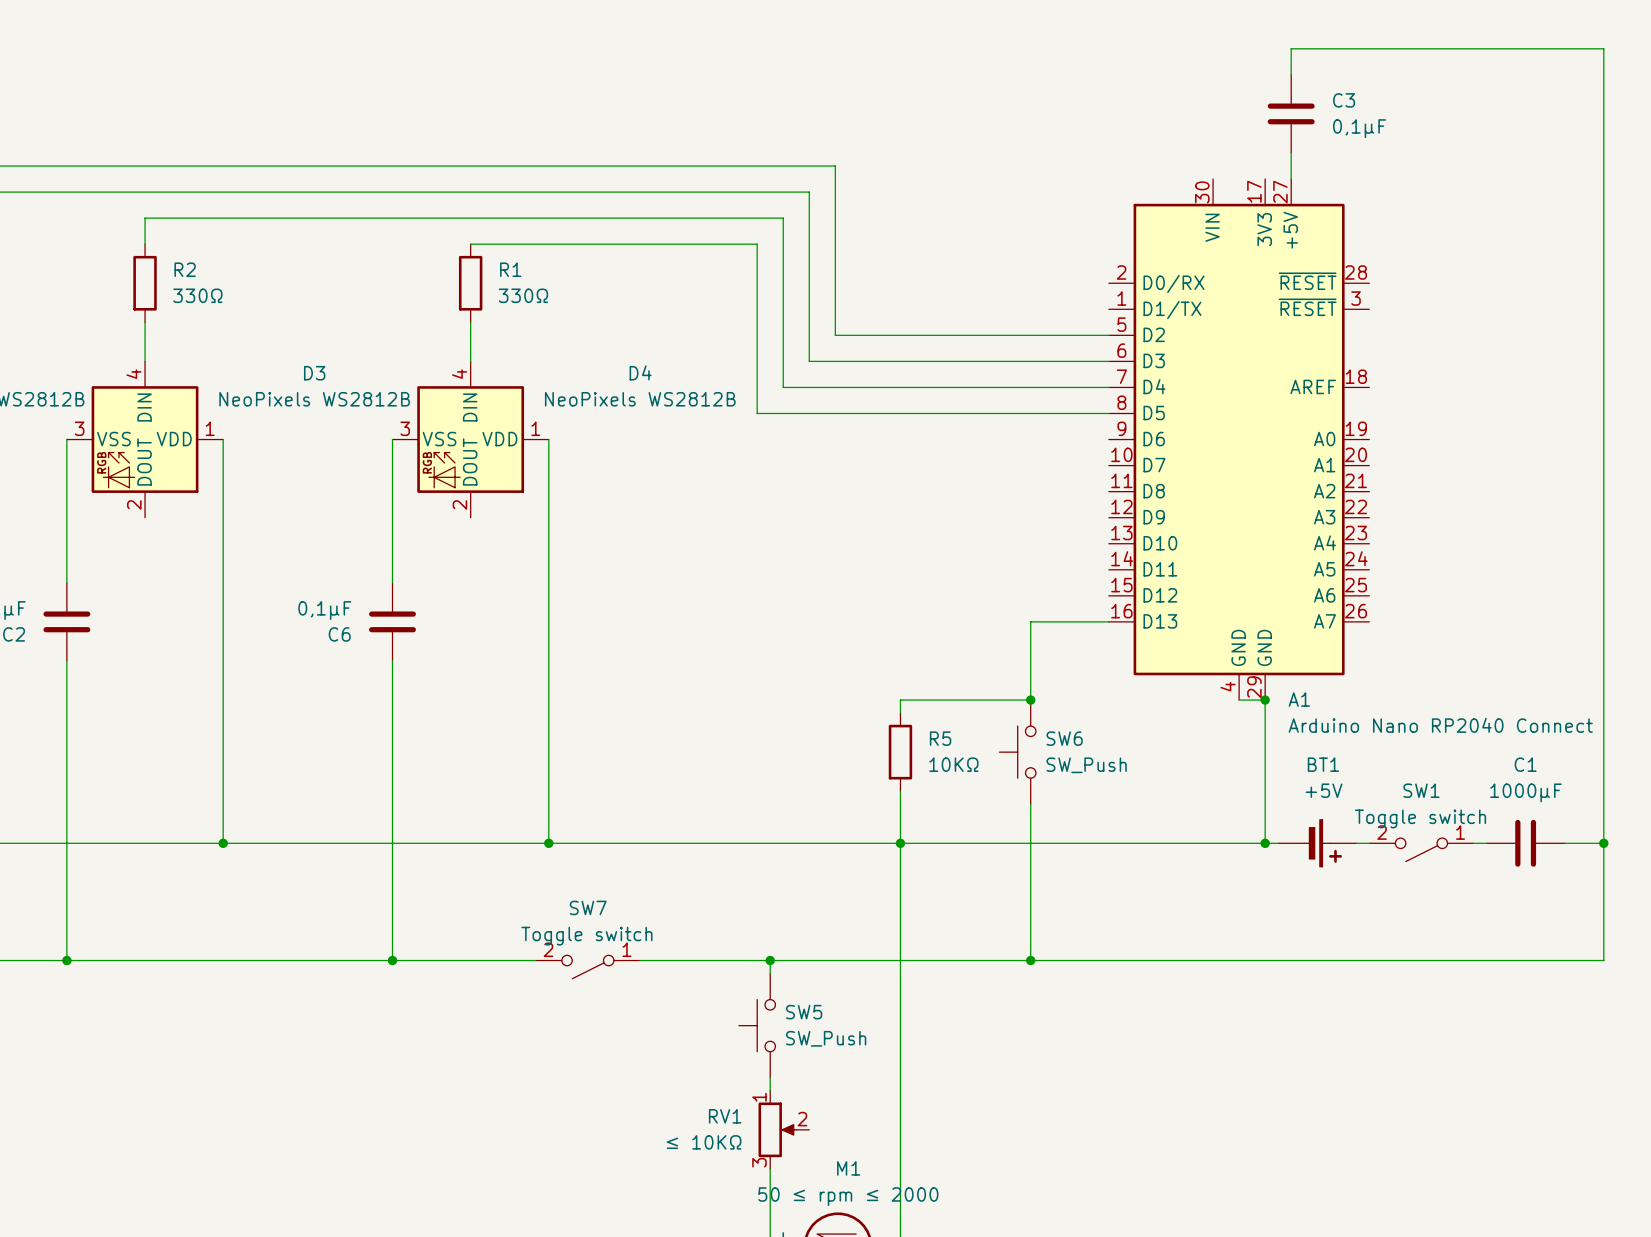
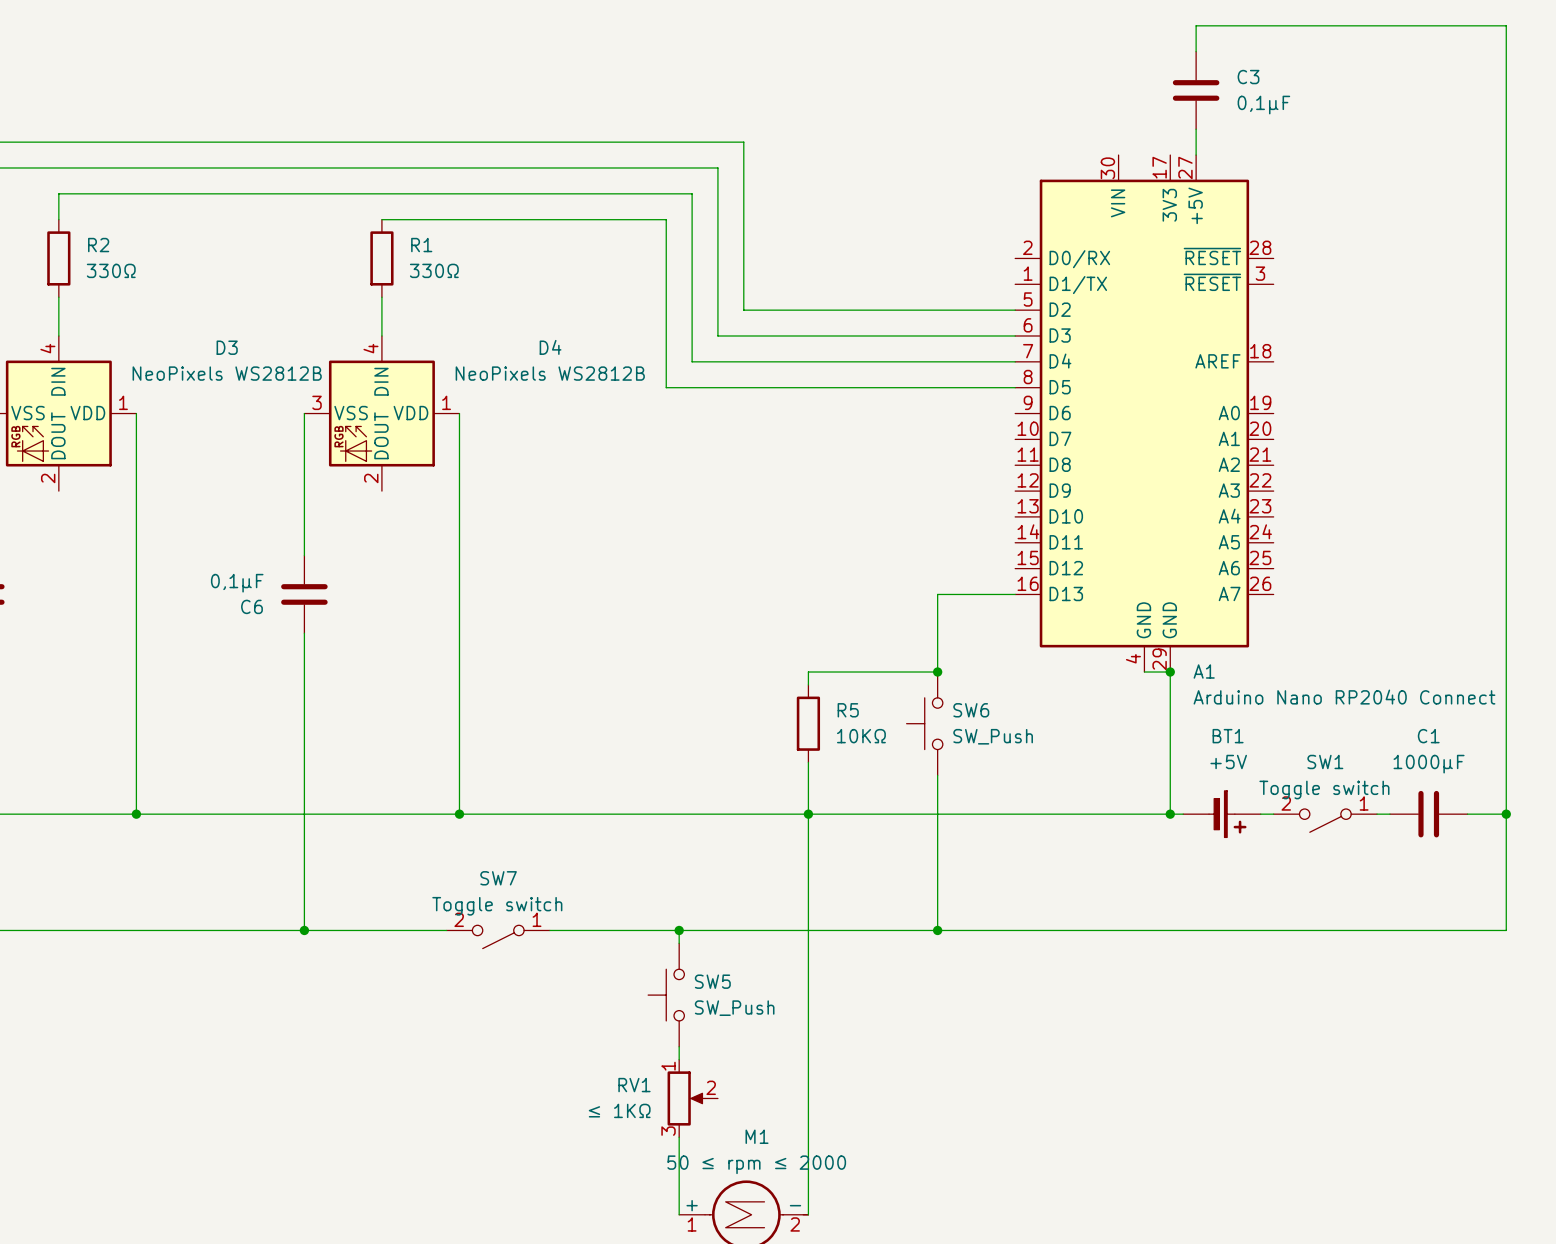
RV1 value: ≤ 10KΩ (704, 1142) -> ≤ 1KΩ (619, 1110)

